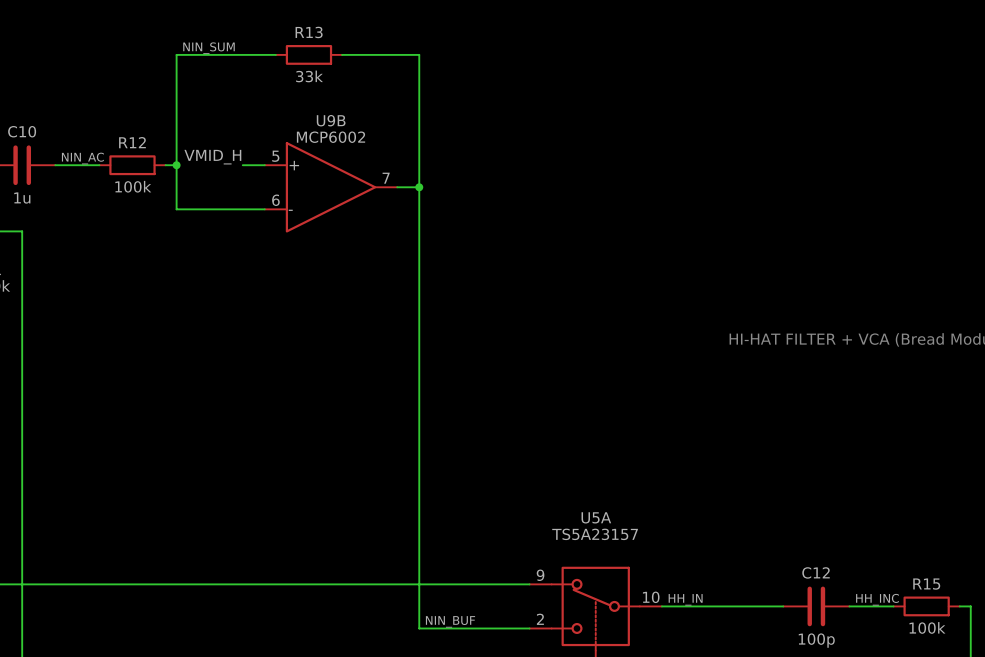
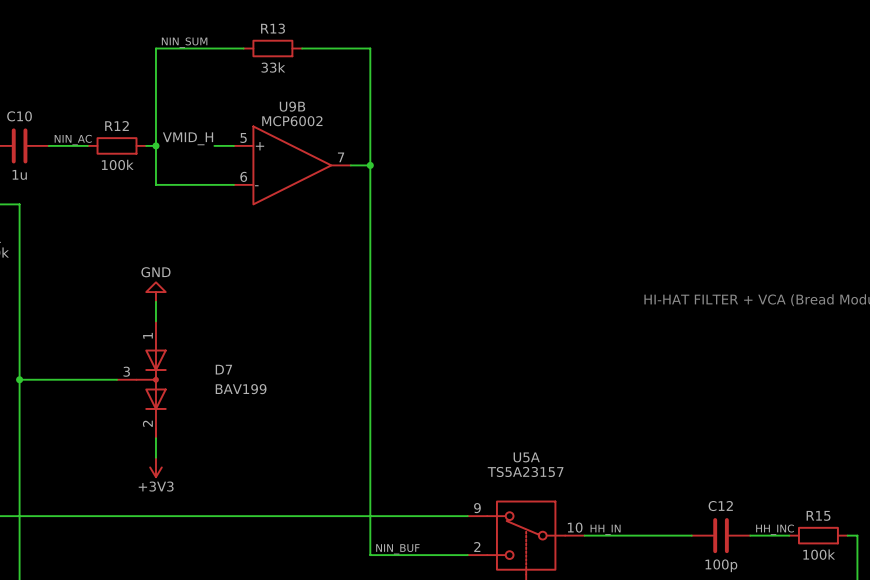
power symbol: none -> GND (155, 292)
wire: none -> (155, 301) (155, 321)
wire: none -> (19, 379) (117, 379)
junction: none -> (19, 379)
D7: none -> BAV199 (141, 379)
wire: none -> (155, 438) (155, 457)
power symbol: none -> +3V3 (155, 467)

